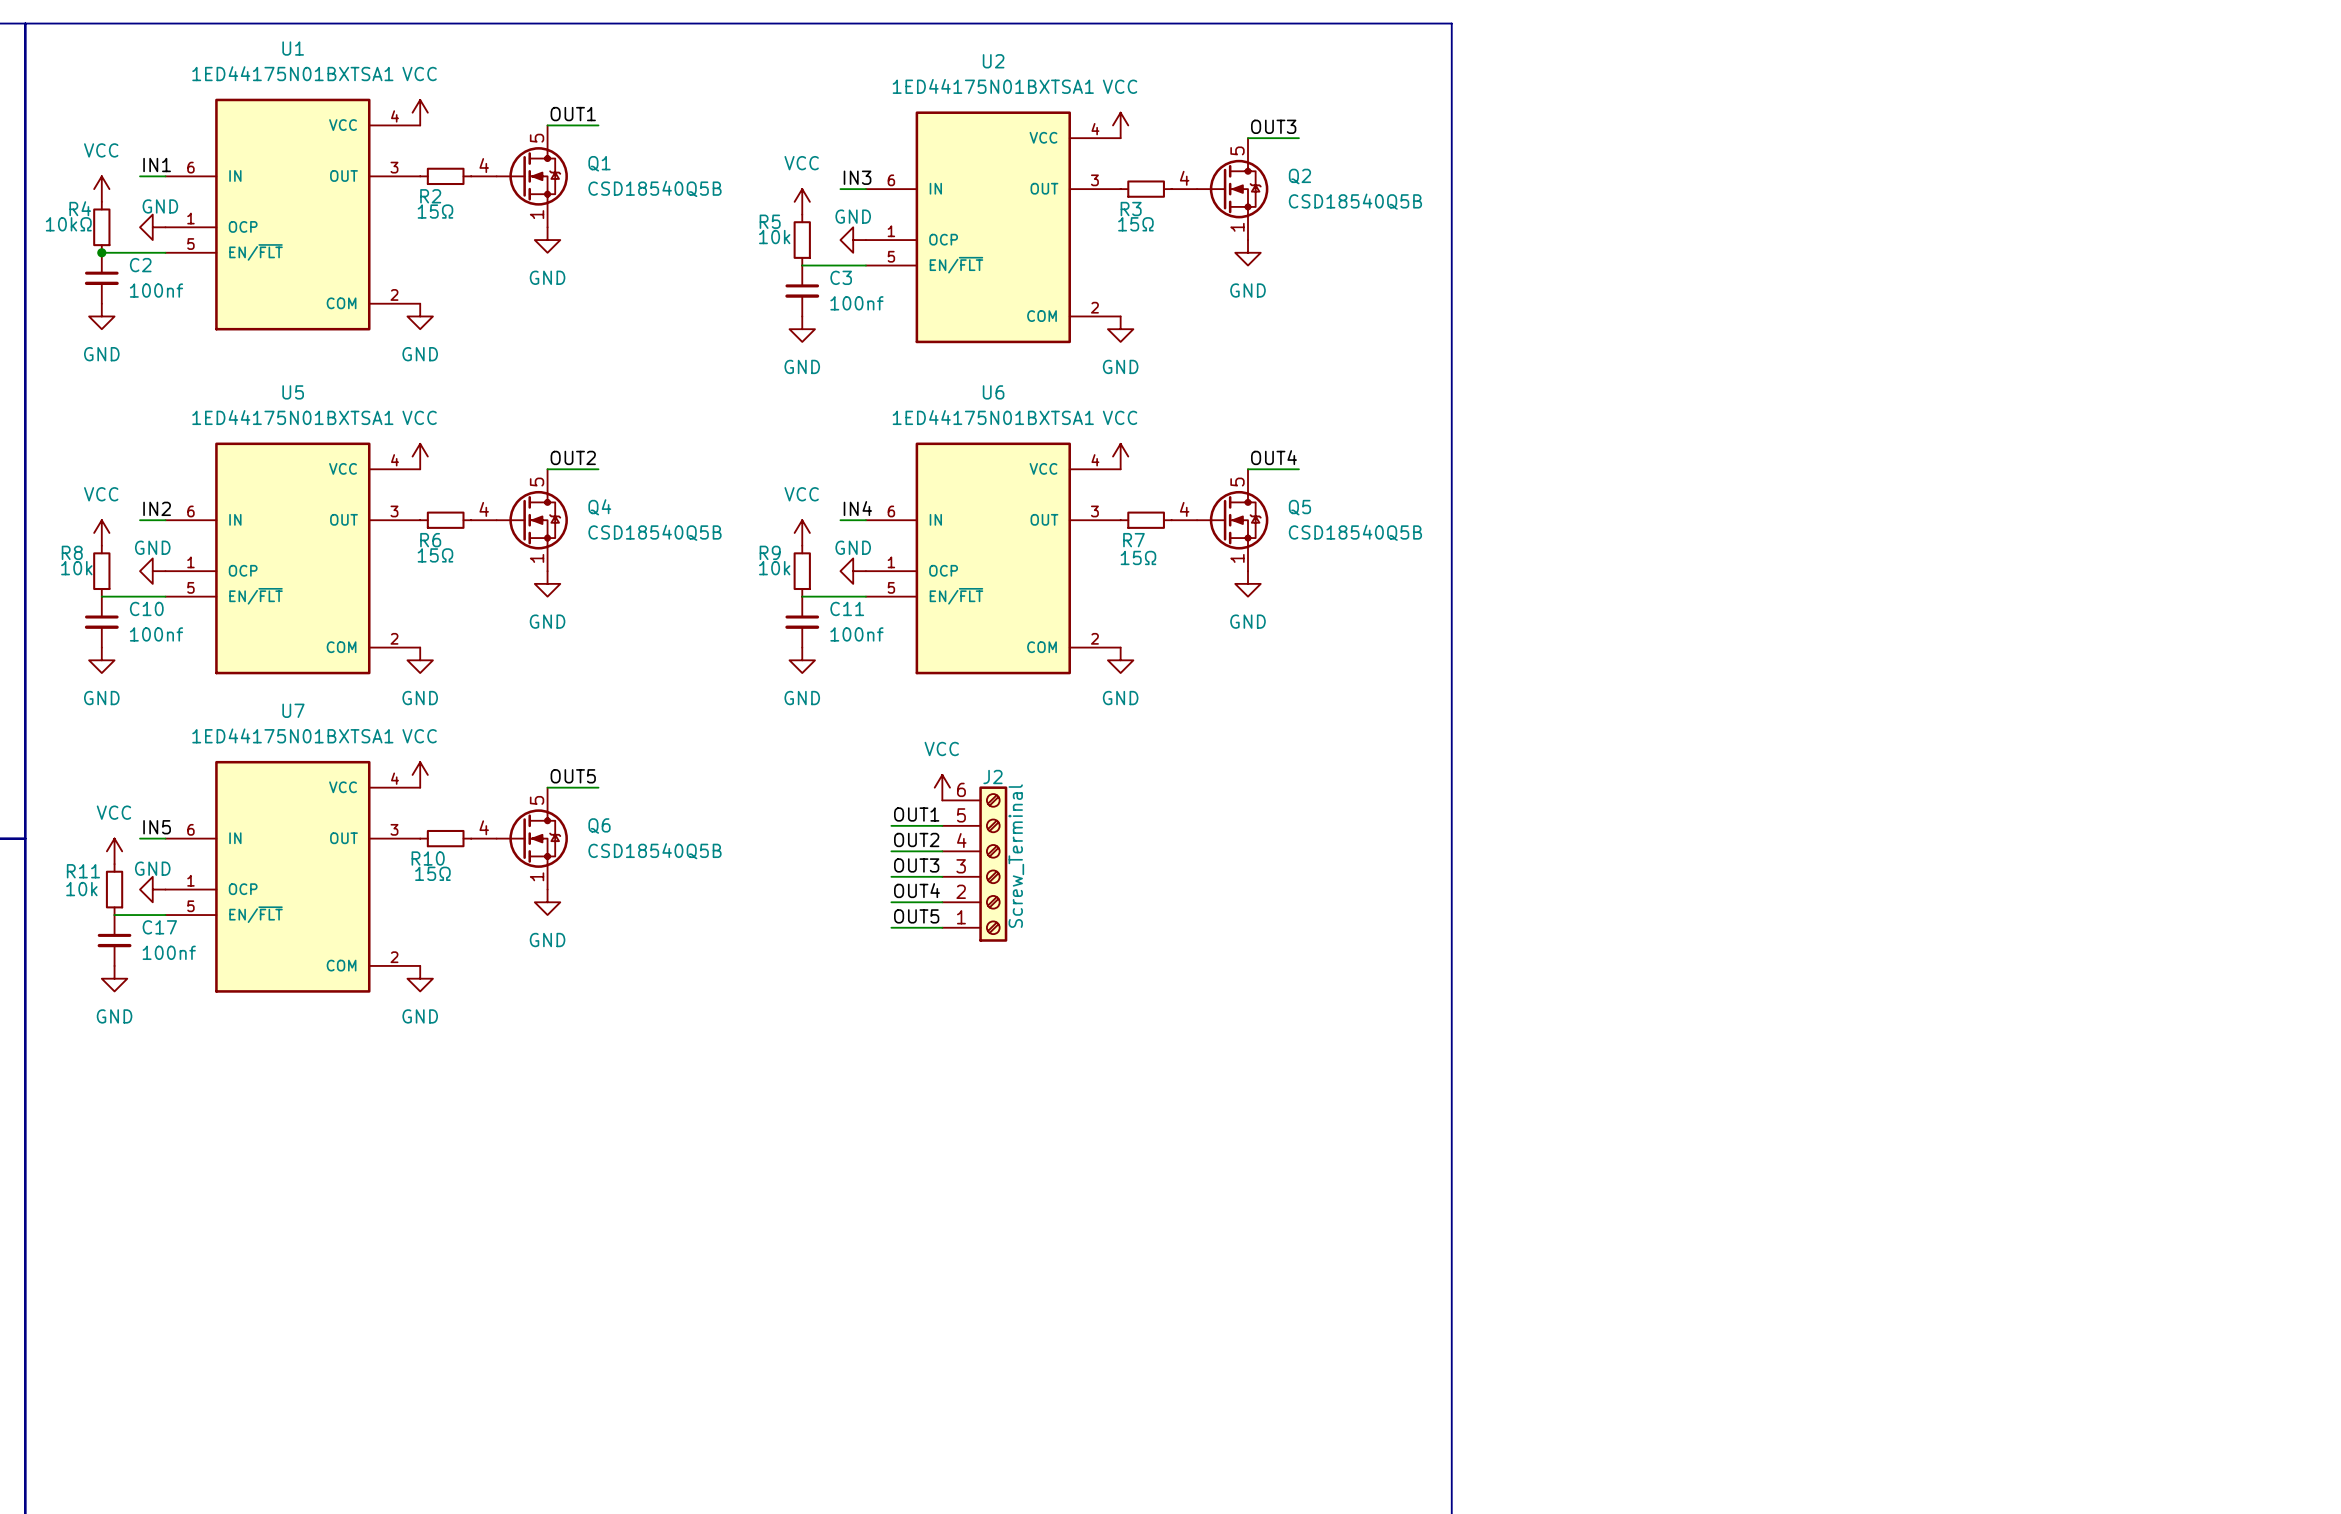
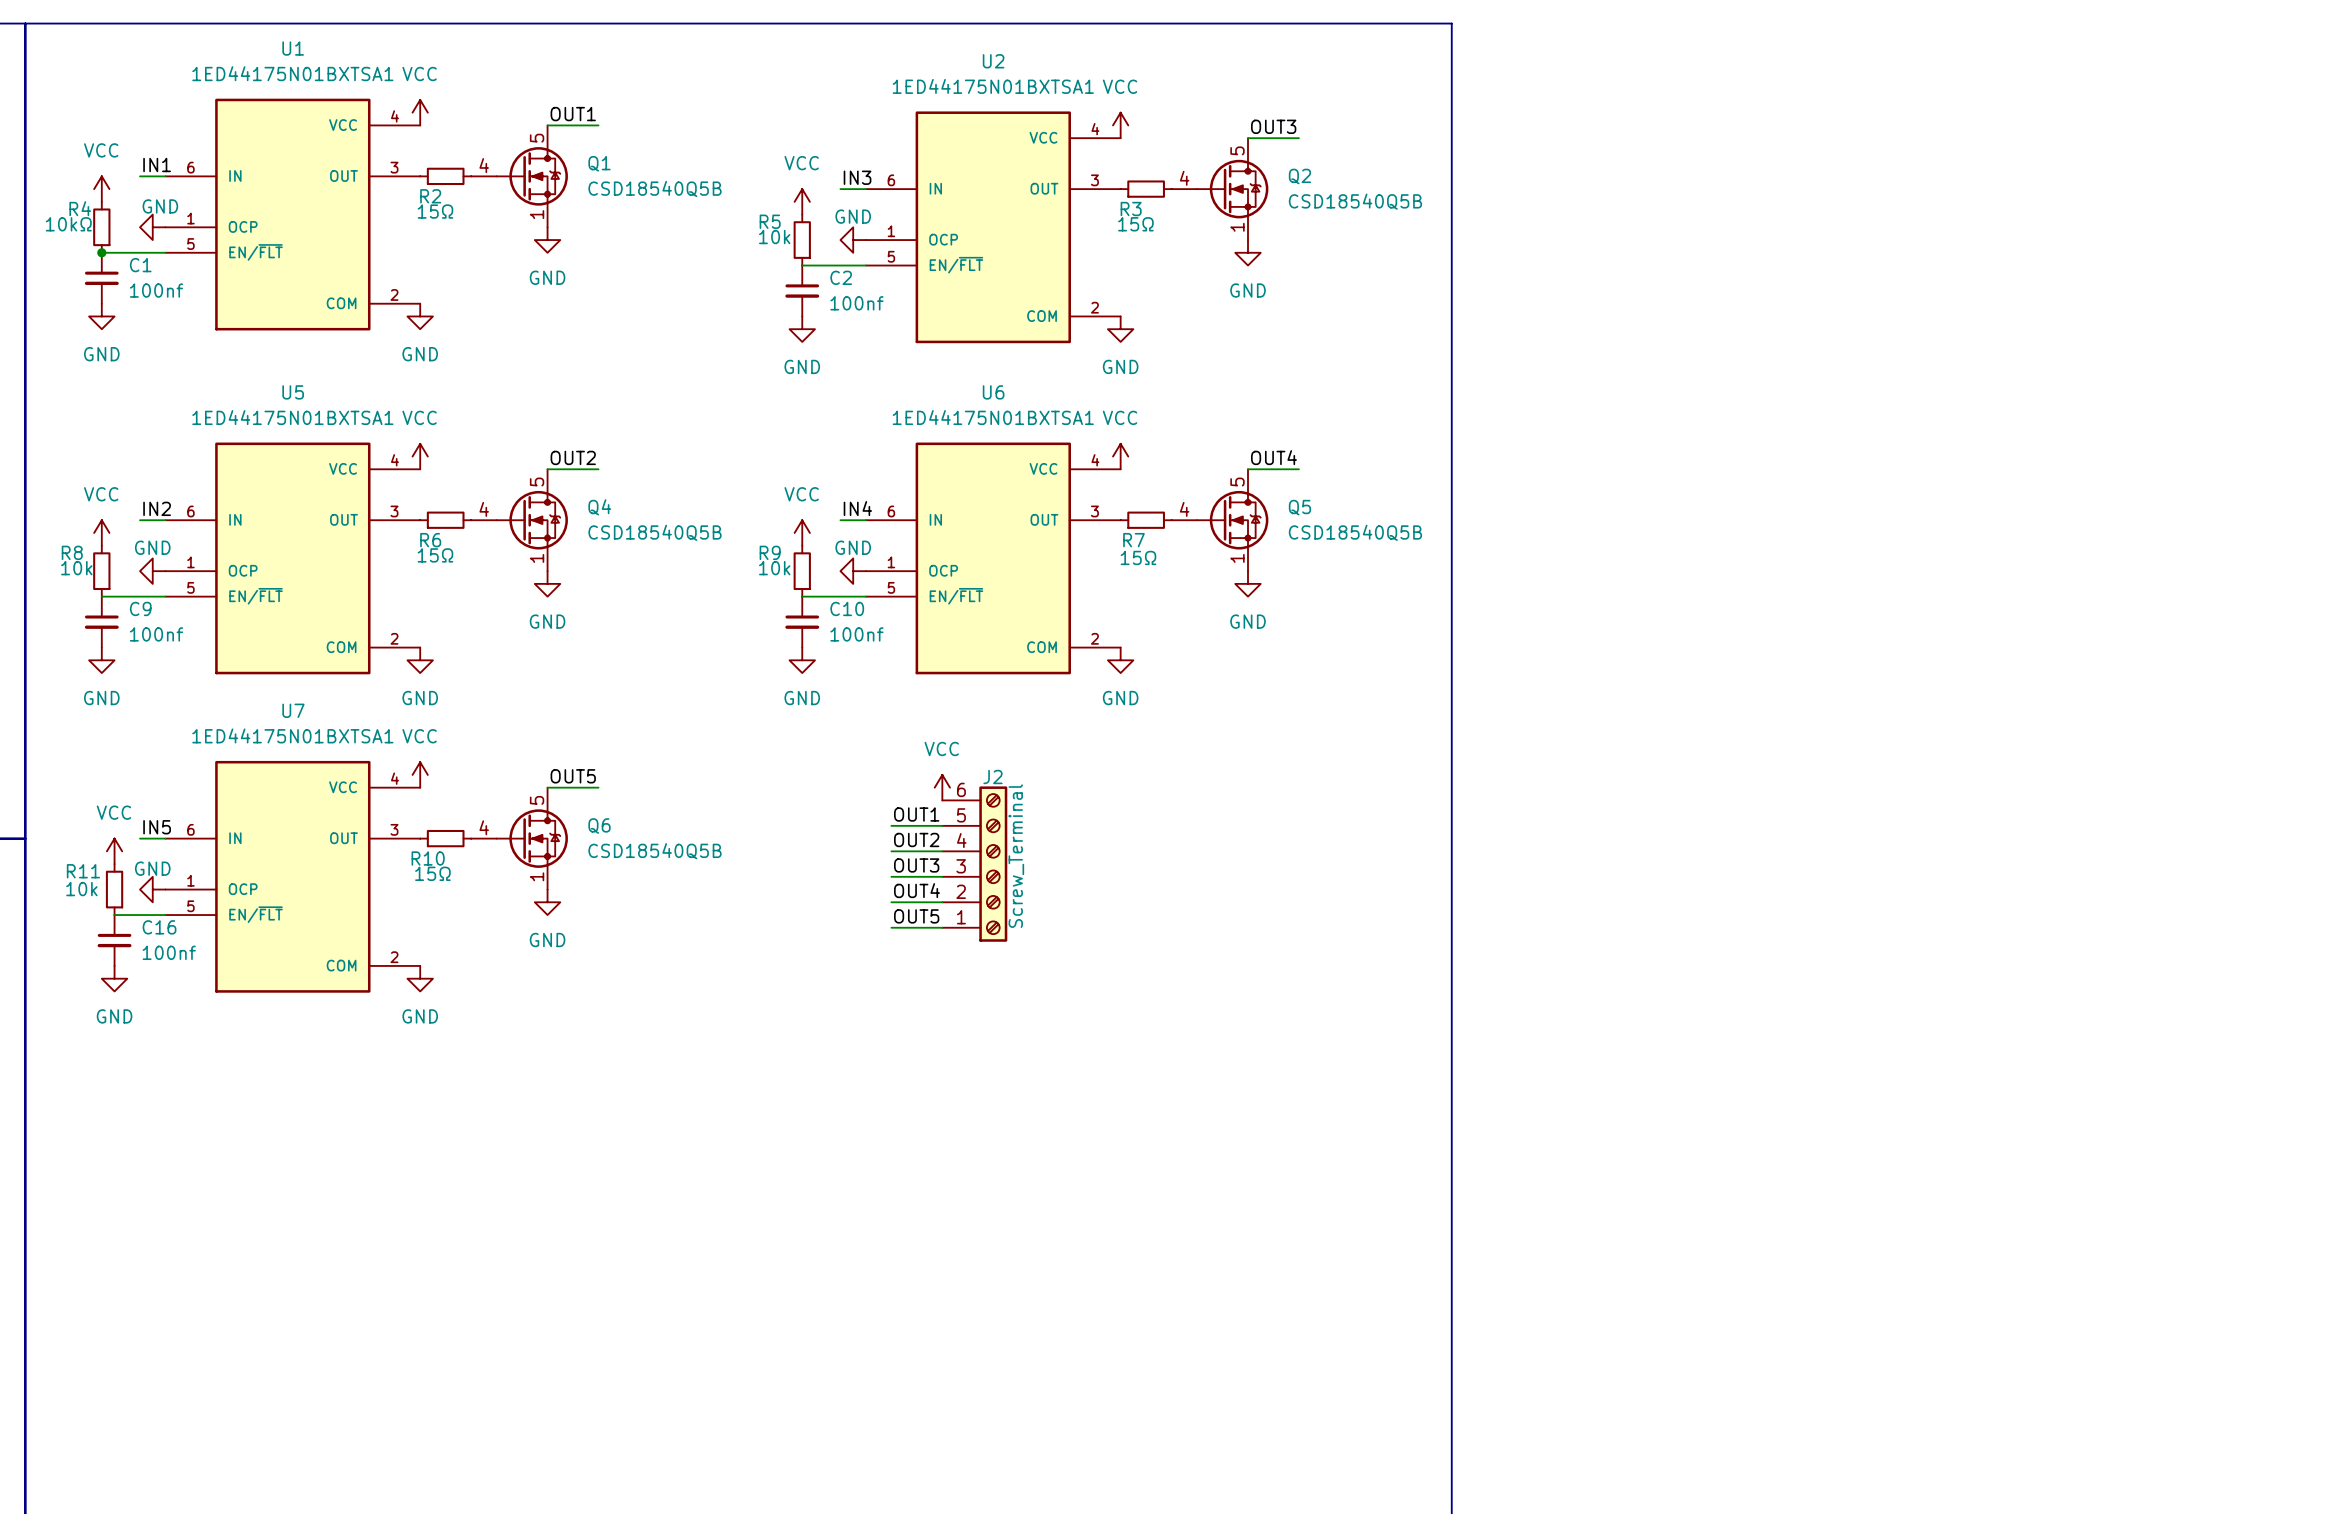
C2 name: C2 (140, 265) -> C1 (140, 265)
C3 name: C3 (841, 277) -> C2 (841, 277)
C10 name: C10 (146, 608) -> C9 (140, 608)
C11 name: C11 (847, 608) -> C10 (847, 608)
C17 name: C17 (159, 927) -> C16 (159, 927)

